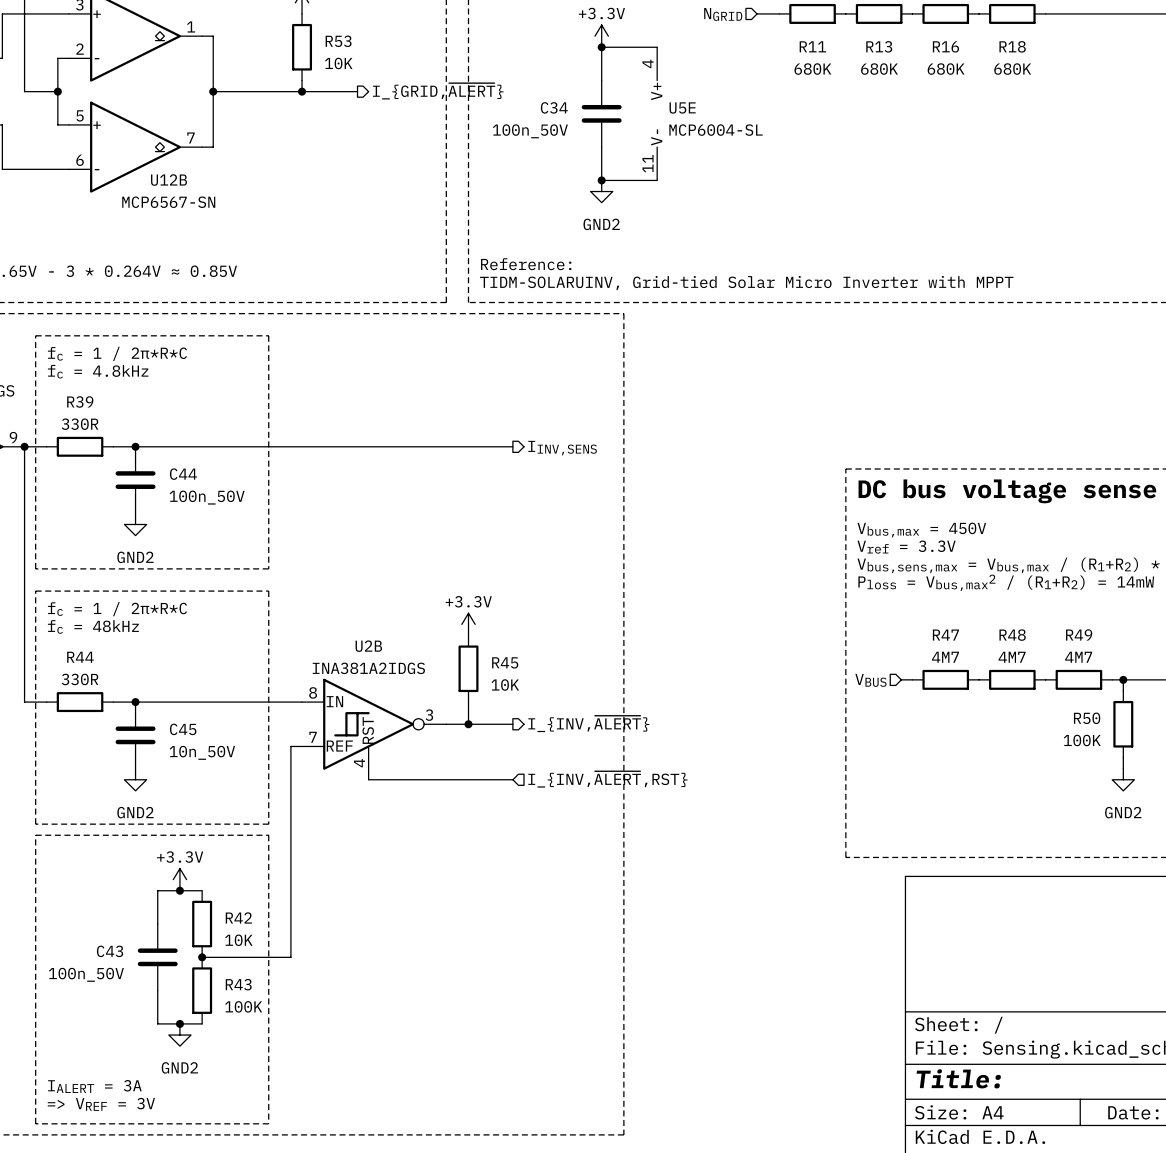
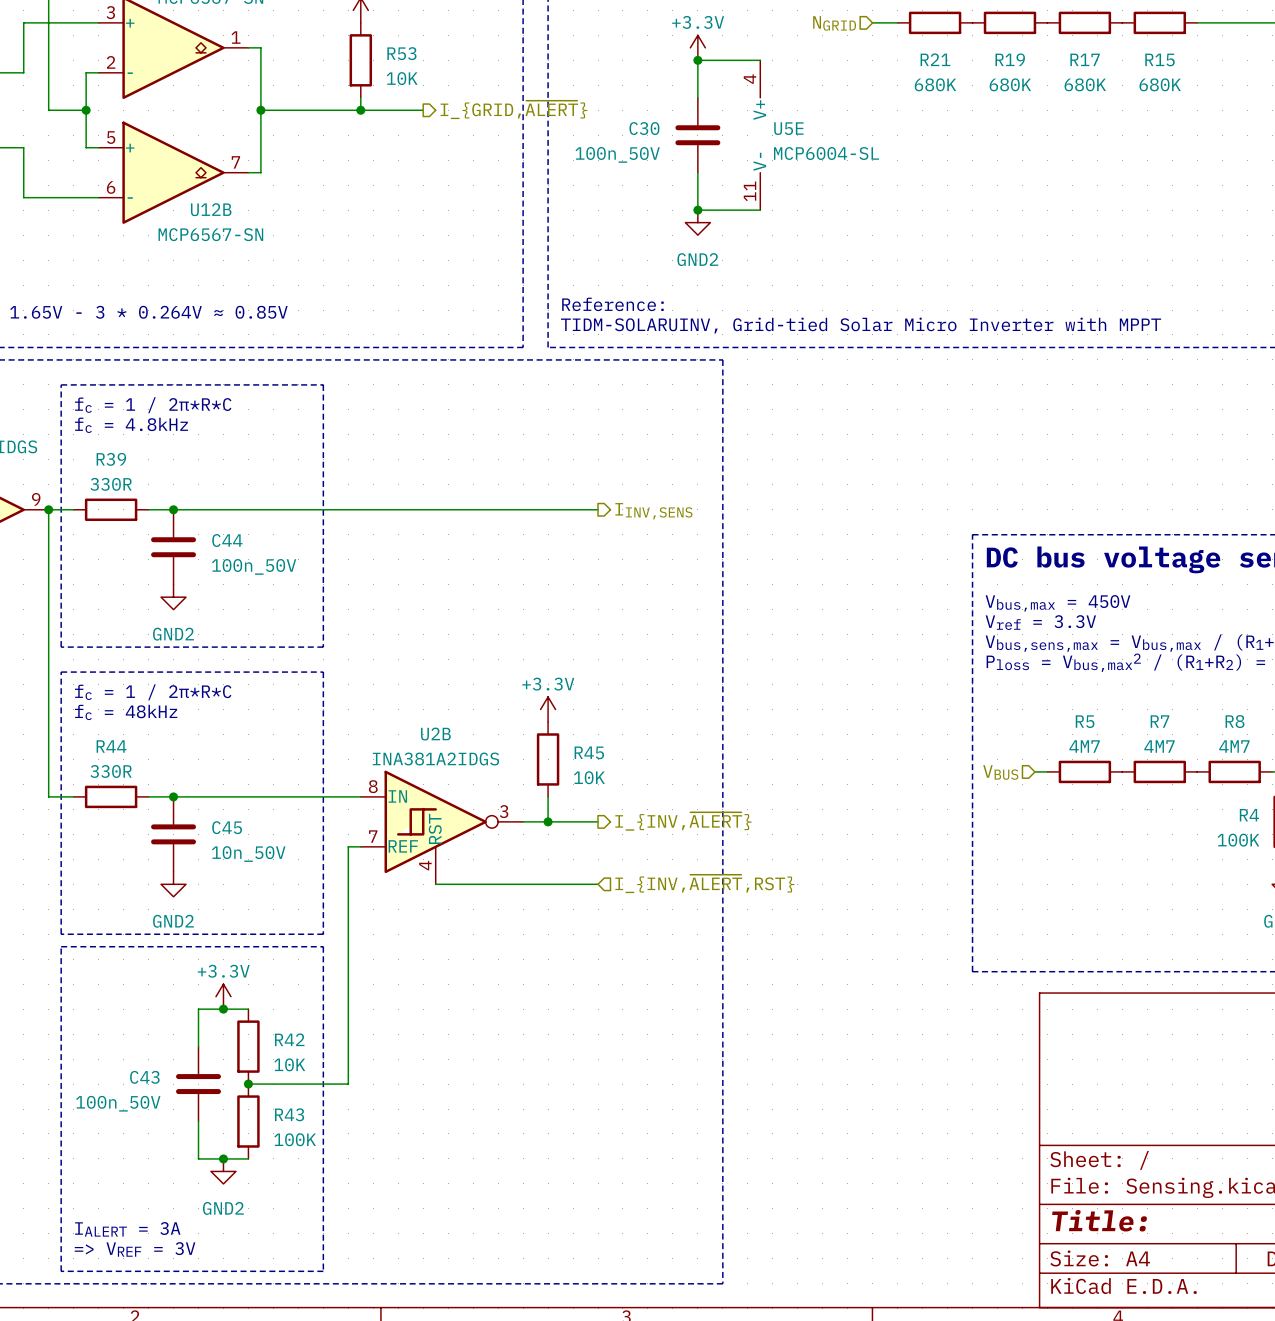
R11 name: R11 (812, 46) -> R21 (935, 59)
R13 name: R13 (879, 46) -> R19 (1010, 59)
R16 name: R16 (945, 46) -> R17 (1085, 59)
R18 name: R18 (1012, 46) -> R15 (1160, 59)
C34 name: C34 (554, 107) -> C30 (644, 128)
R49 name: R49 (1079, 634) -> R8 (1235, 721)
R47 name: R47 (945, 635) -> R5 (1085, 721)
R48 name: R48 (1012, 635) -> R7 (1159, 721)
R50 name: R50 (1087, 718) -> R4 (1249, 815)

